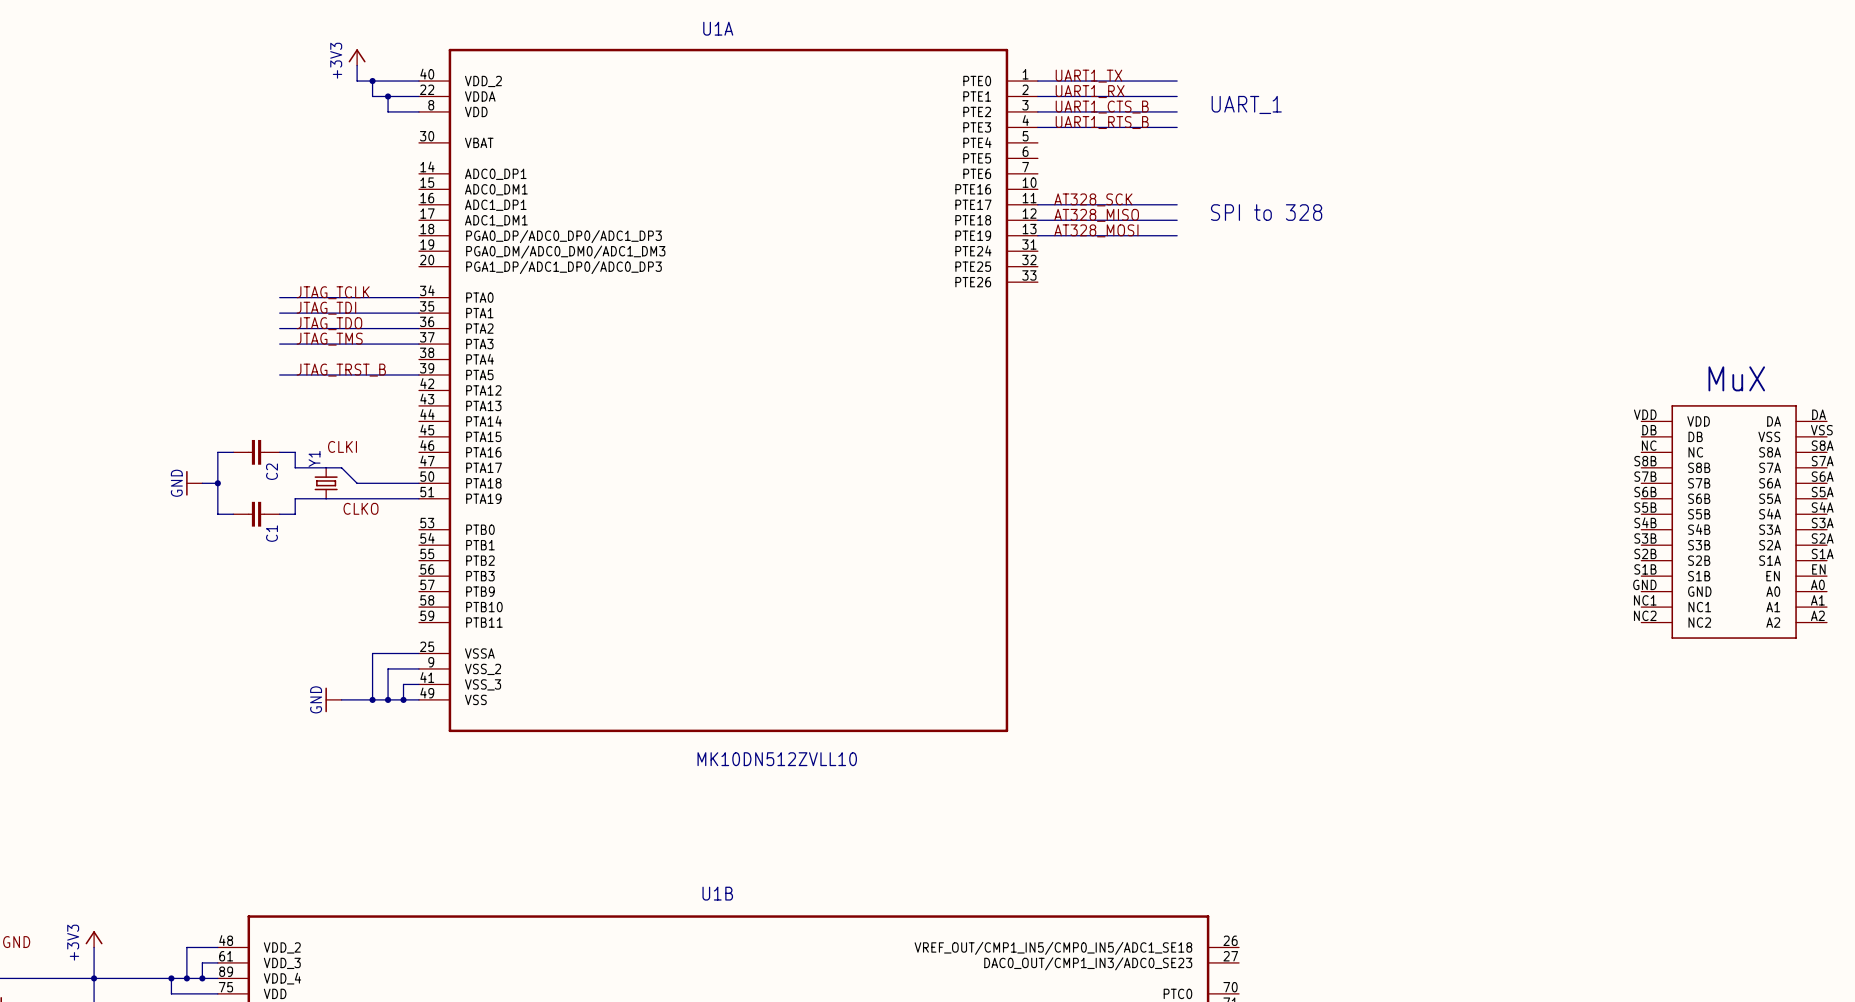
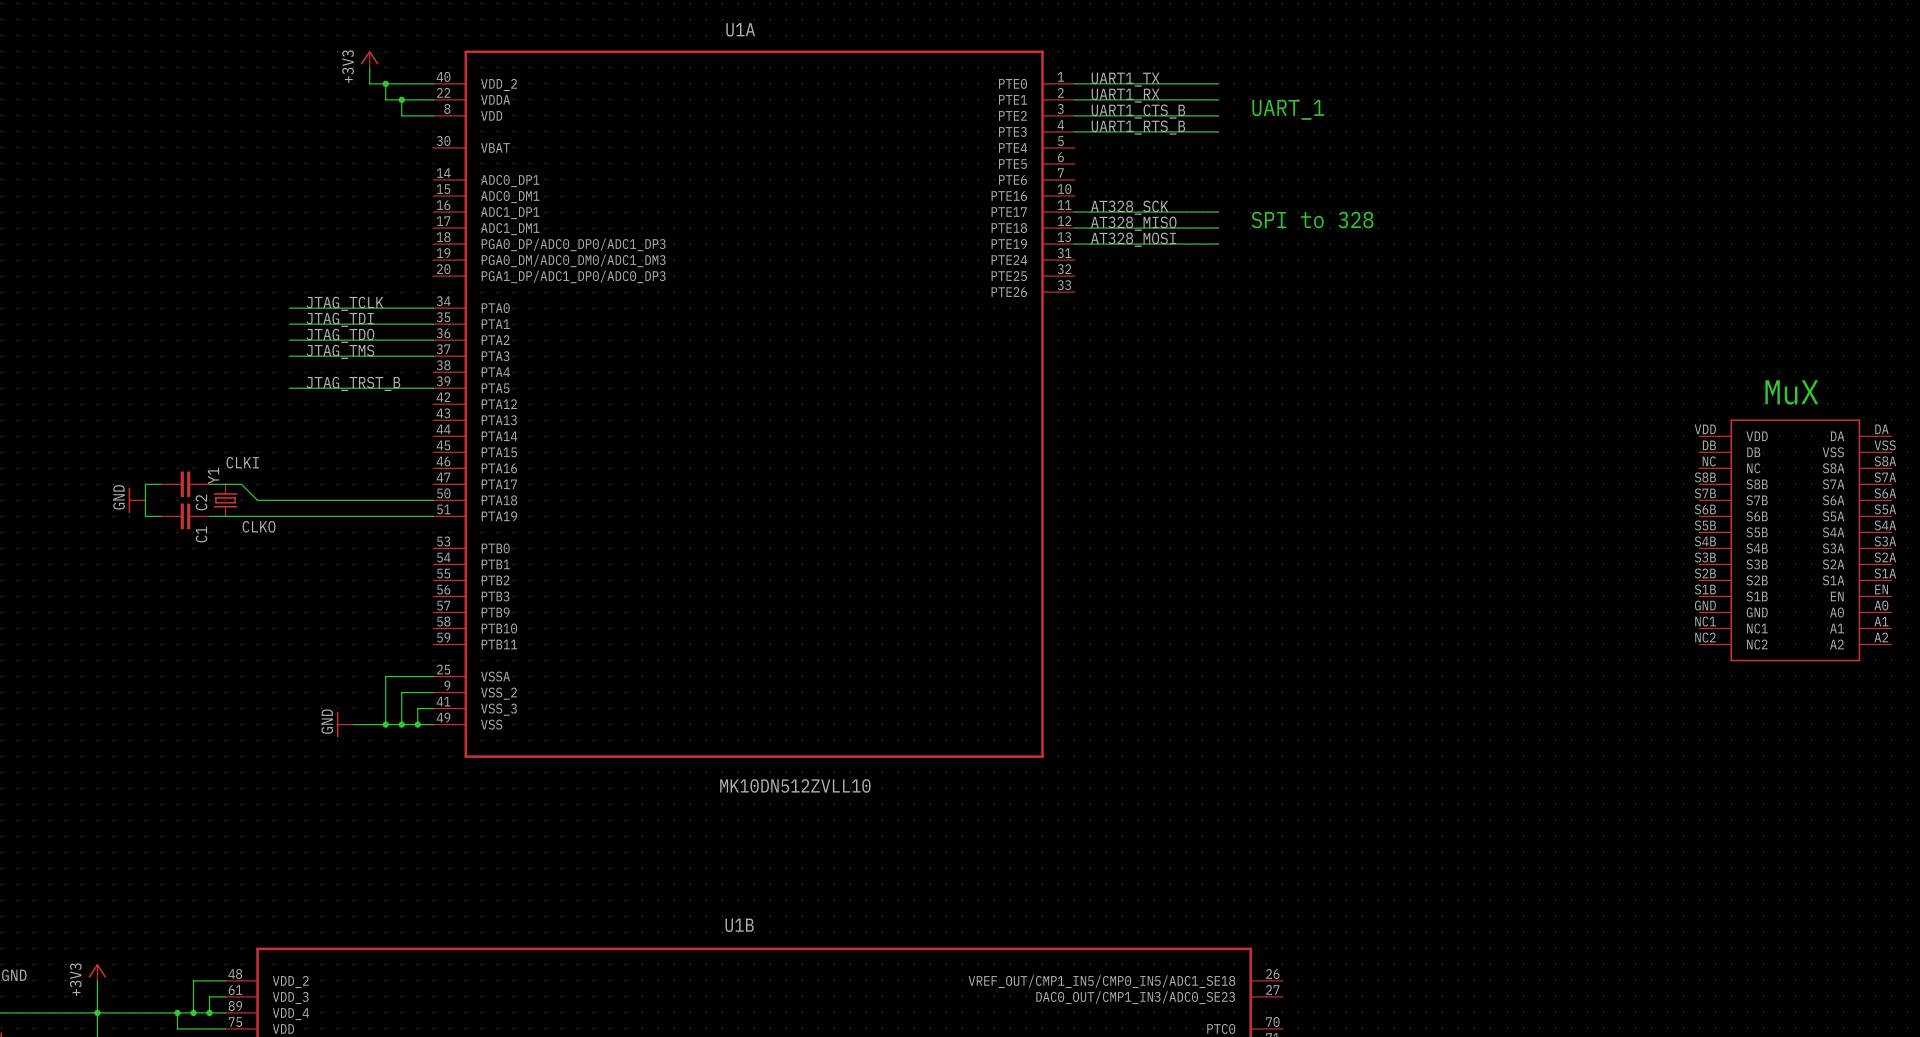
label position: CLKI (342, 446) -> CLKI (242, 462)
wire: (233, 452) (217, 452) (217, 514) (233, 514) -> none
C2 position: (256, 452) -> (185, 484)
wire: (279, 452) (295, 452) (295, 467) (341, 467) (357, 483) -> (209, 484) (241, 484) (257, 500) (369, 500)
wire: none -> (161, 484) (145, 484) (145, 516) (161, 516)
power symbol position: GND (194, 483) -> GND (137, 500)
wire: (202, 483) (217, 483) -> none
junction: (217, 483) -> none
Y1 position: (326, 483) -> (225, 500)
wire: (295, 498) (295, 514) (279, 514) -> (305, 516) (209, 516)
label position: CLKO (360, 508) -> CLKO (259, 526)
C1 position: (256, 514) -> (185, 516)

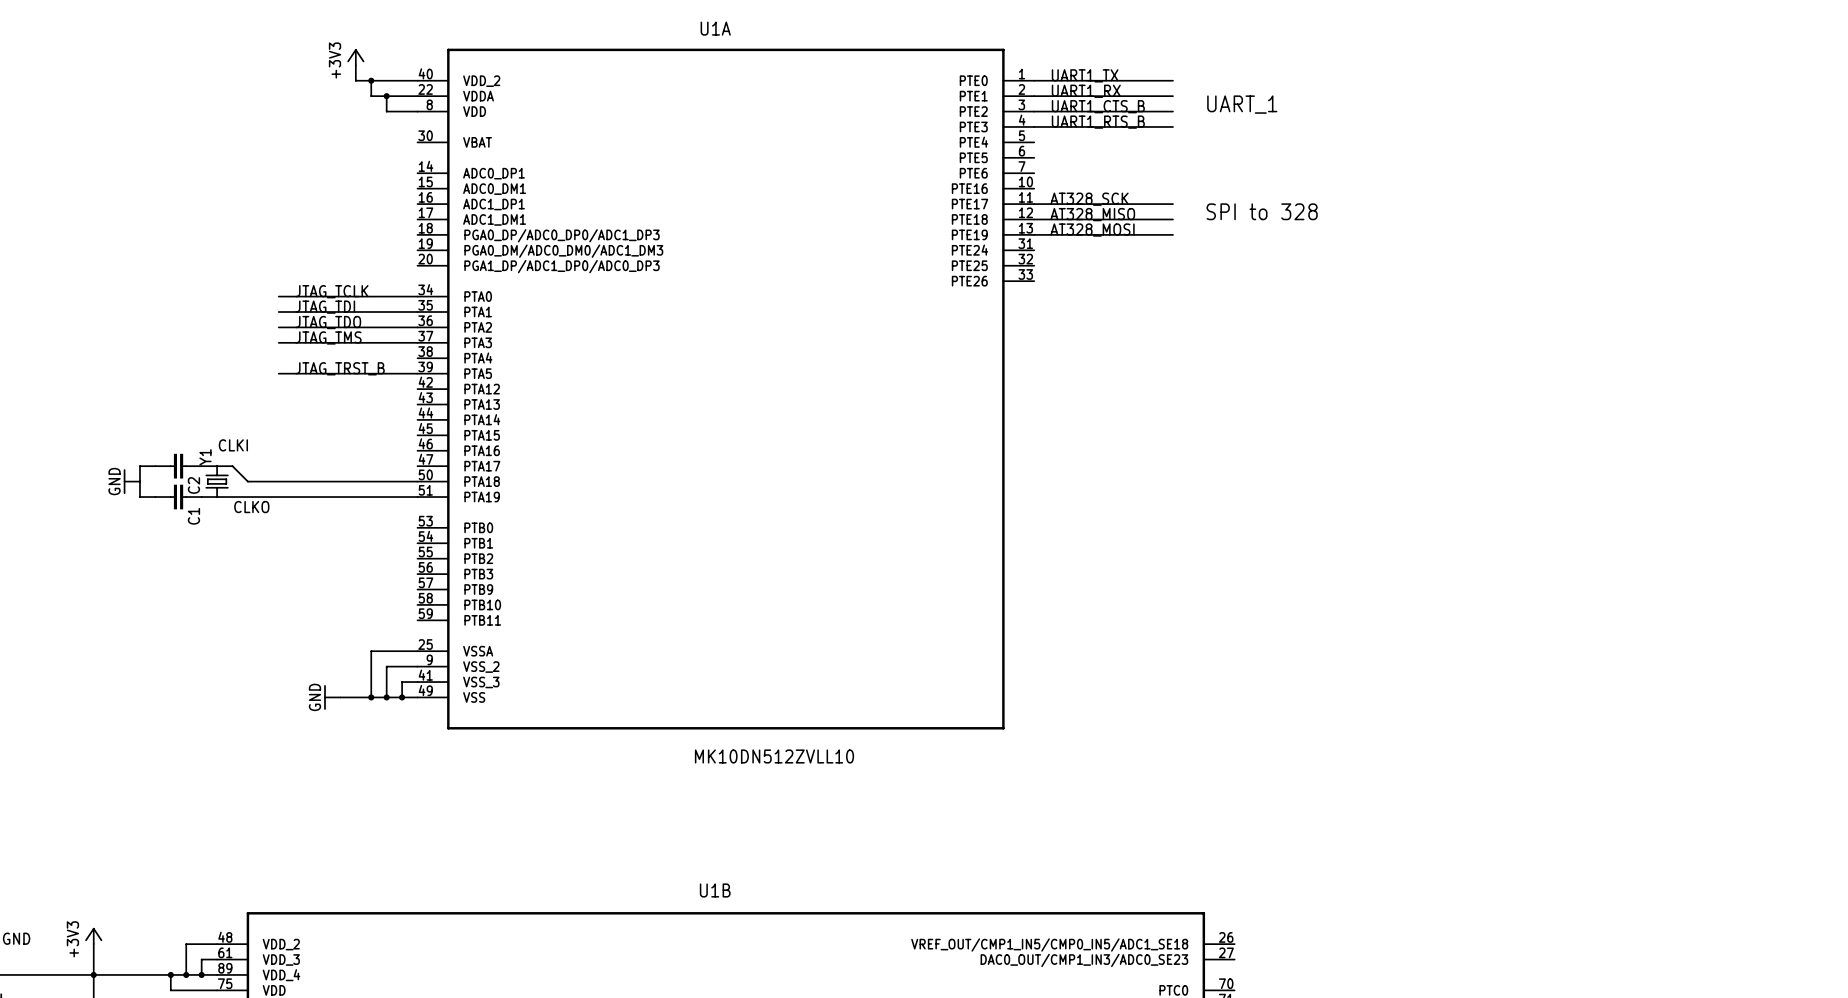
text: MuX (1791, 392) -> none
part: (1795, 540) -> none

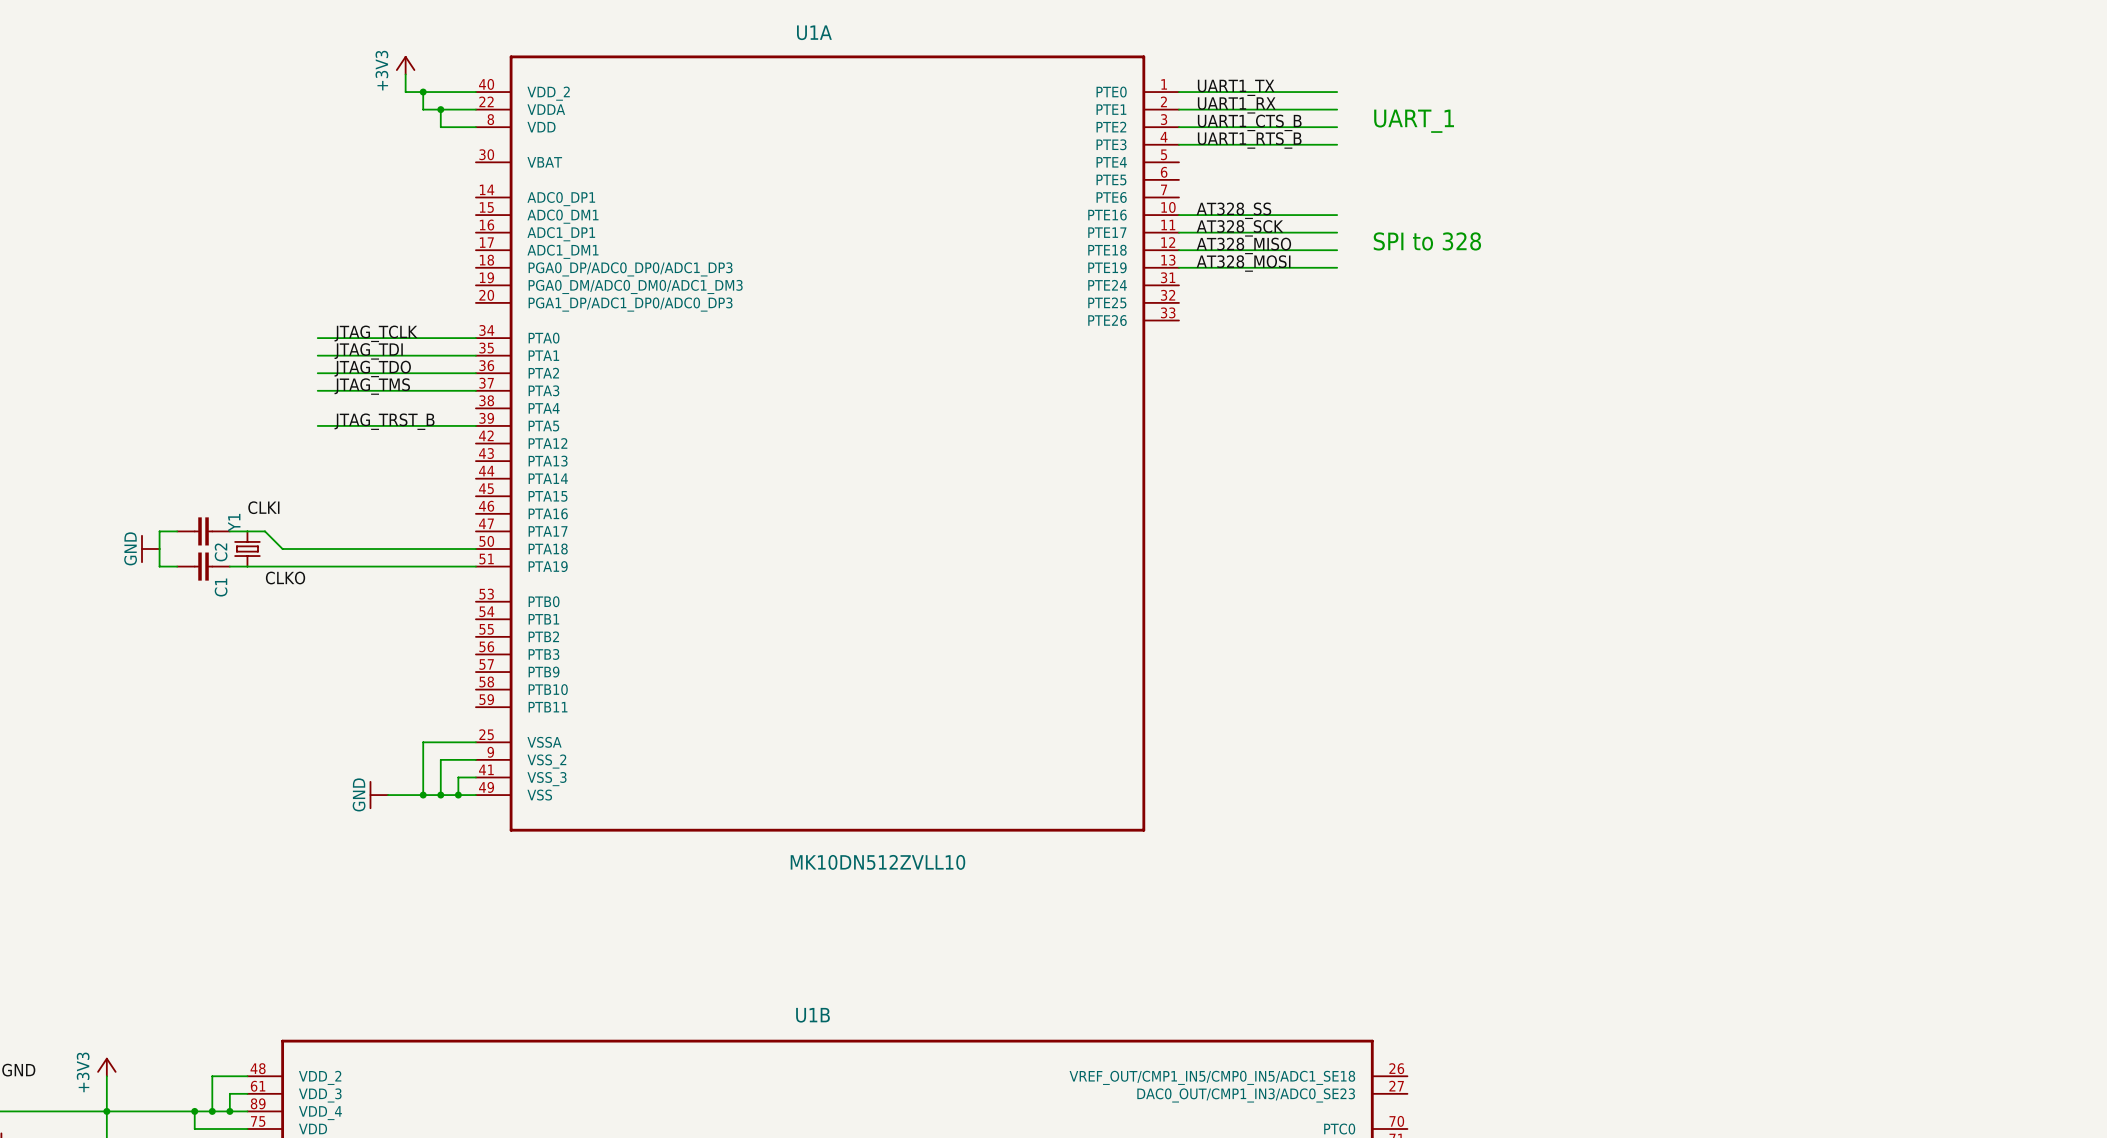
label: none -> AT328_SS (1233, 210)
wire: none -> (1178, 215) (1337, 215)

